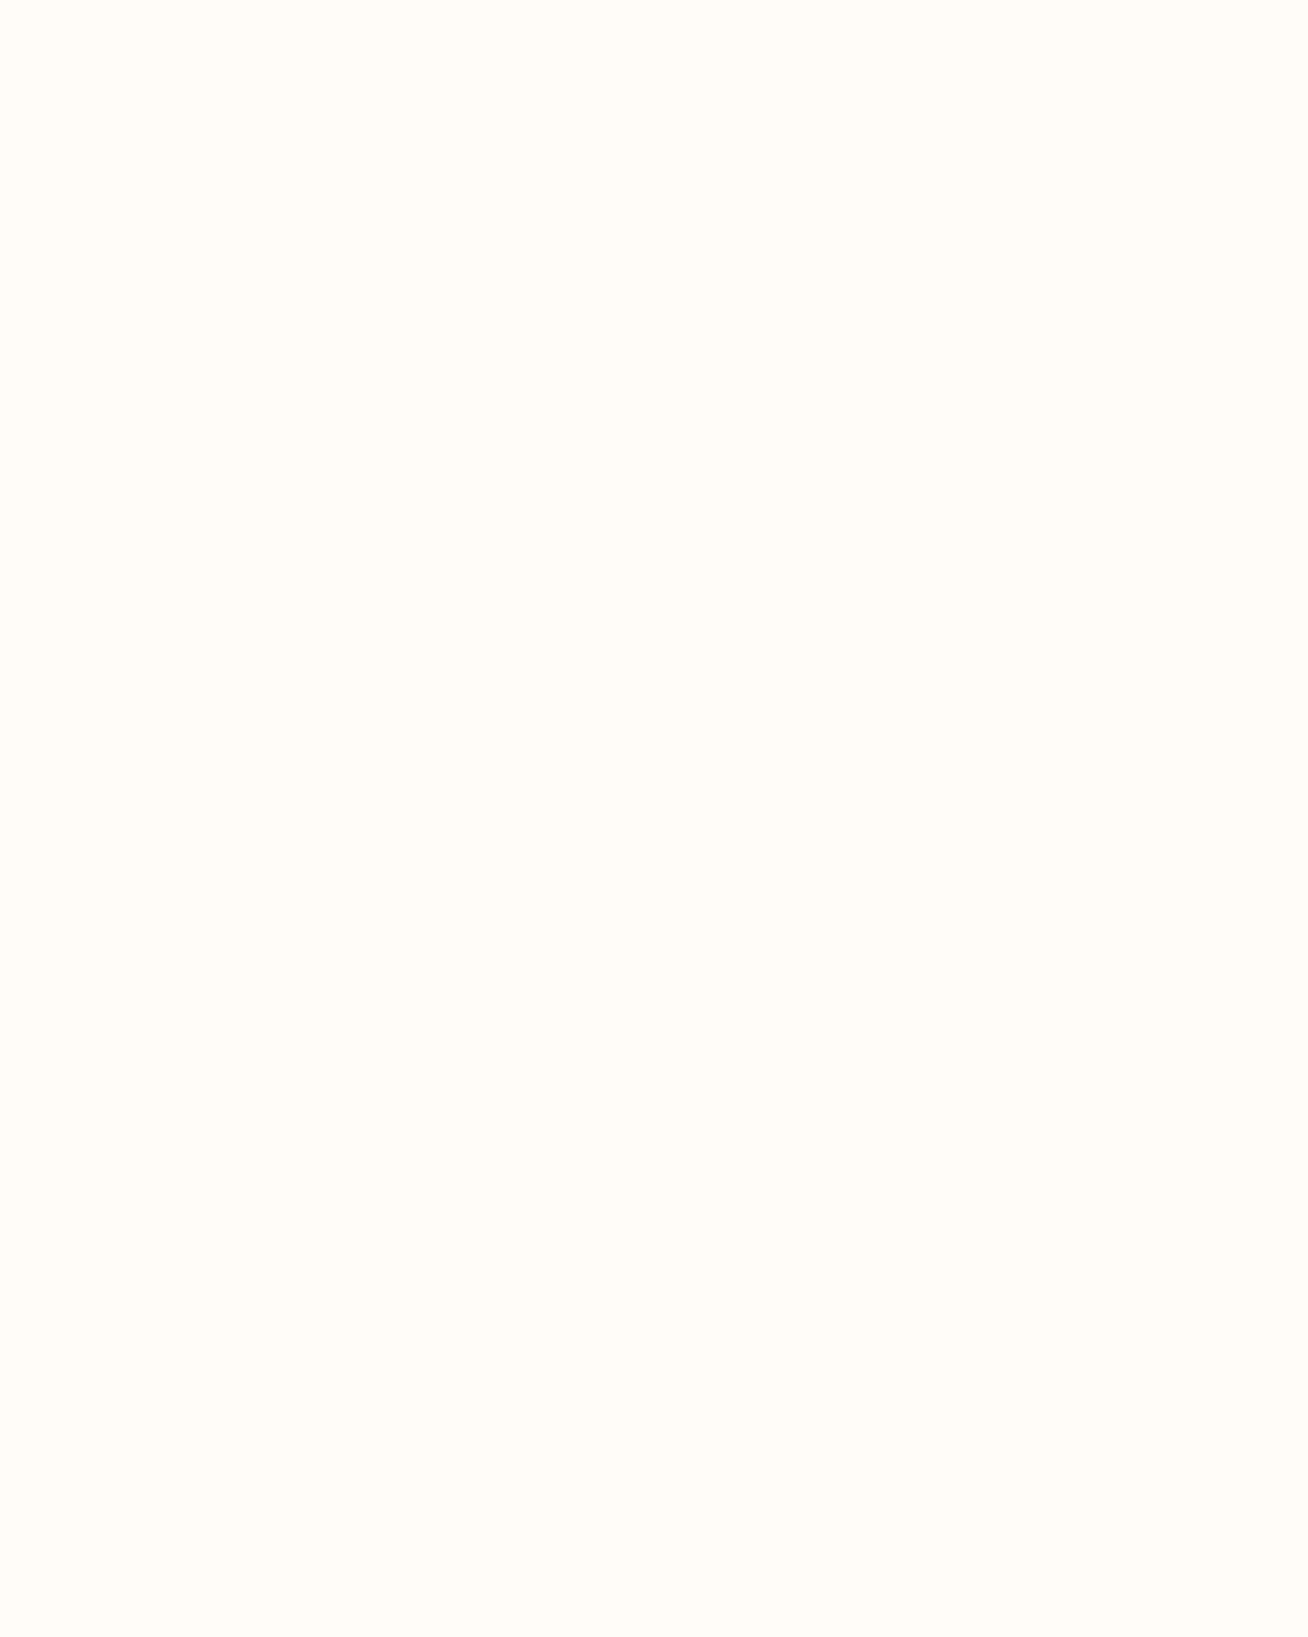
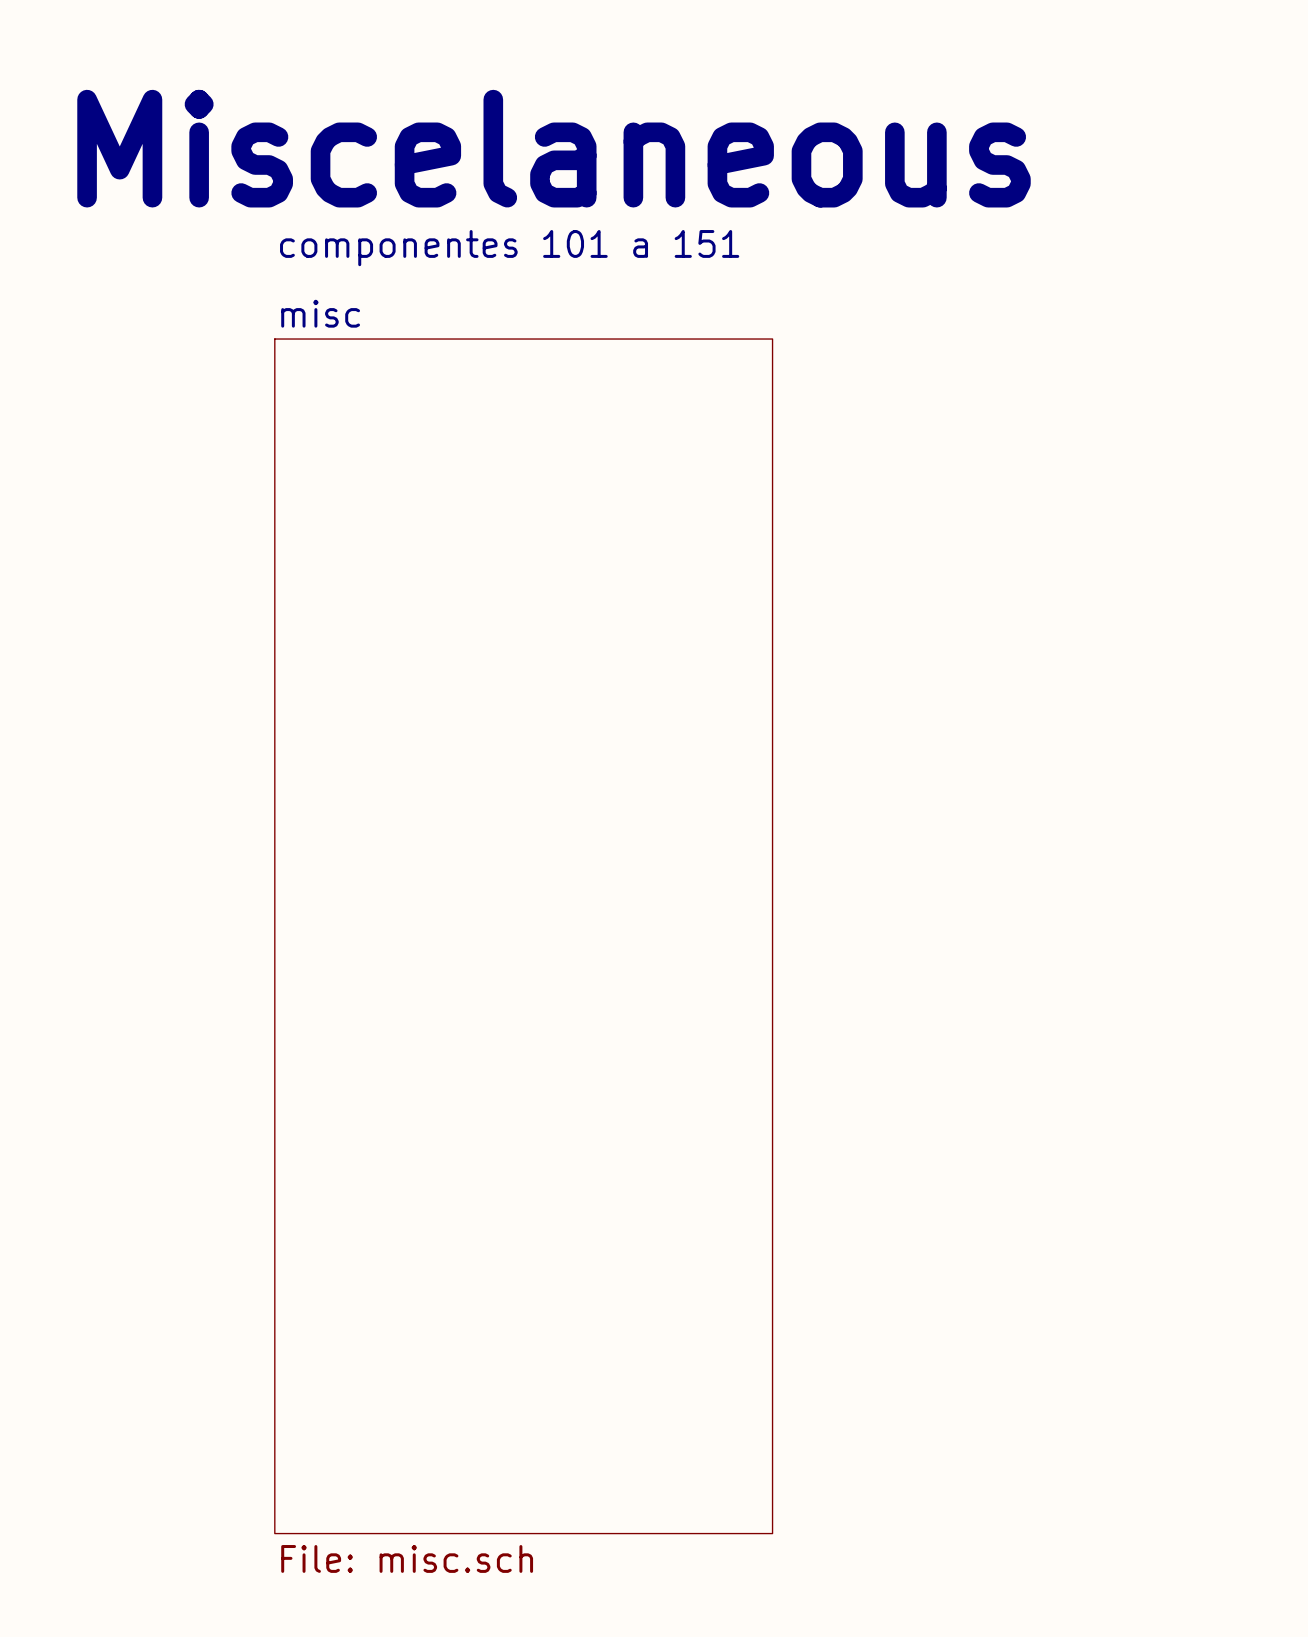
text: none -> Miscelaneous (554, 148)
text: none -> componentes 101 a 151 (509, 248)
sheet misc: none -> File: misc.sch (523, 936)

